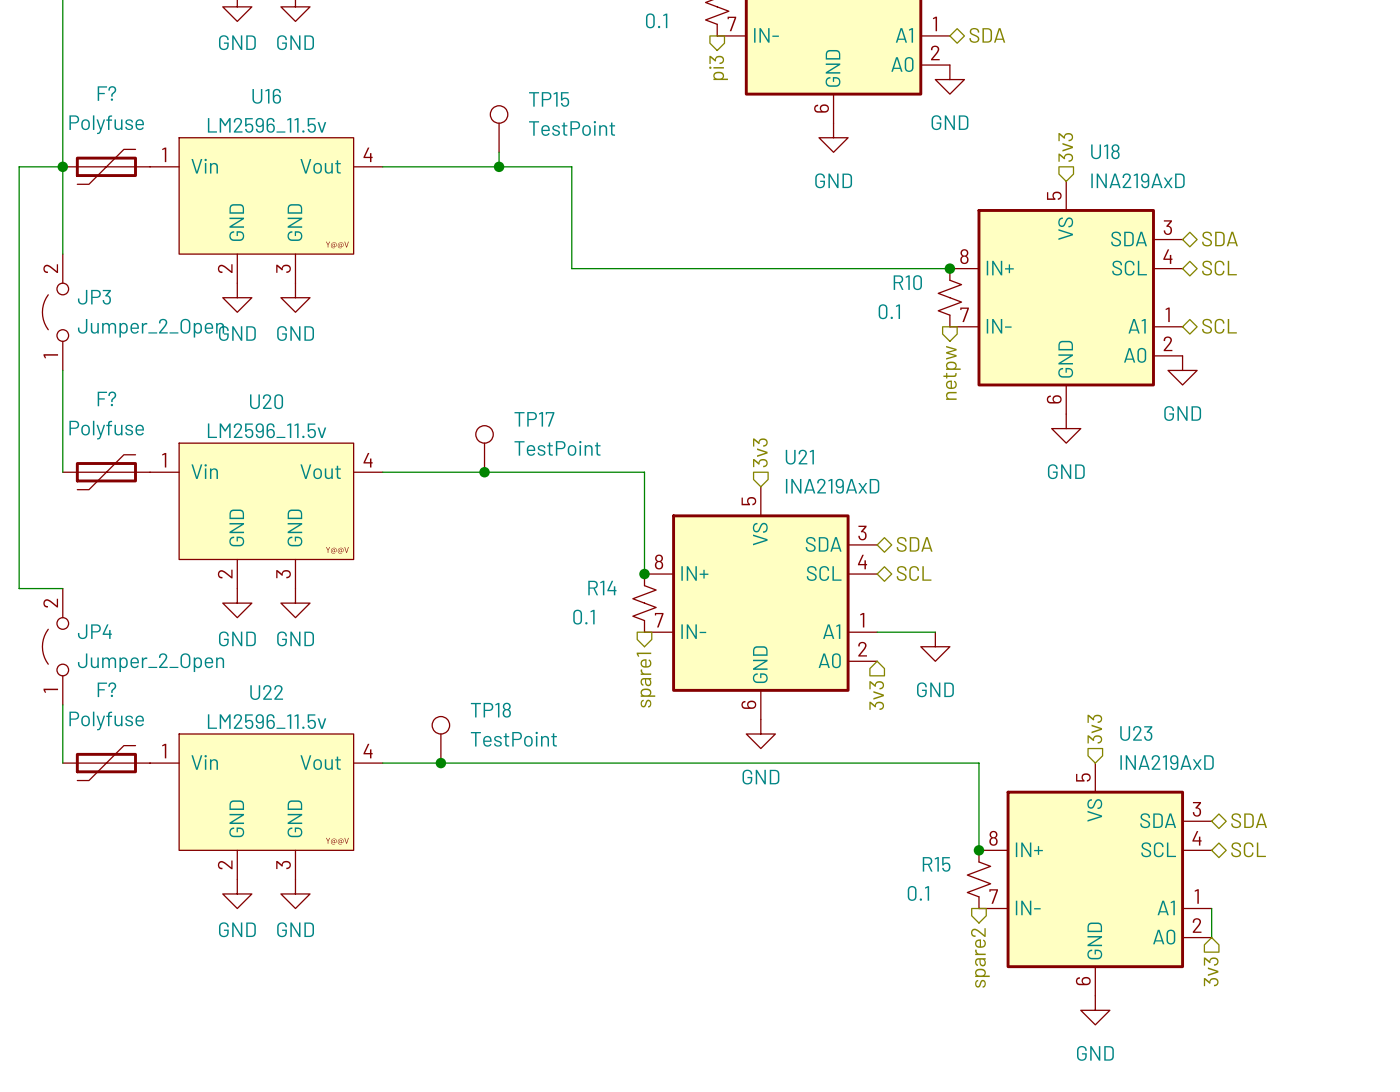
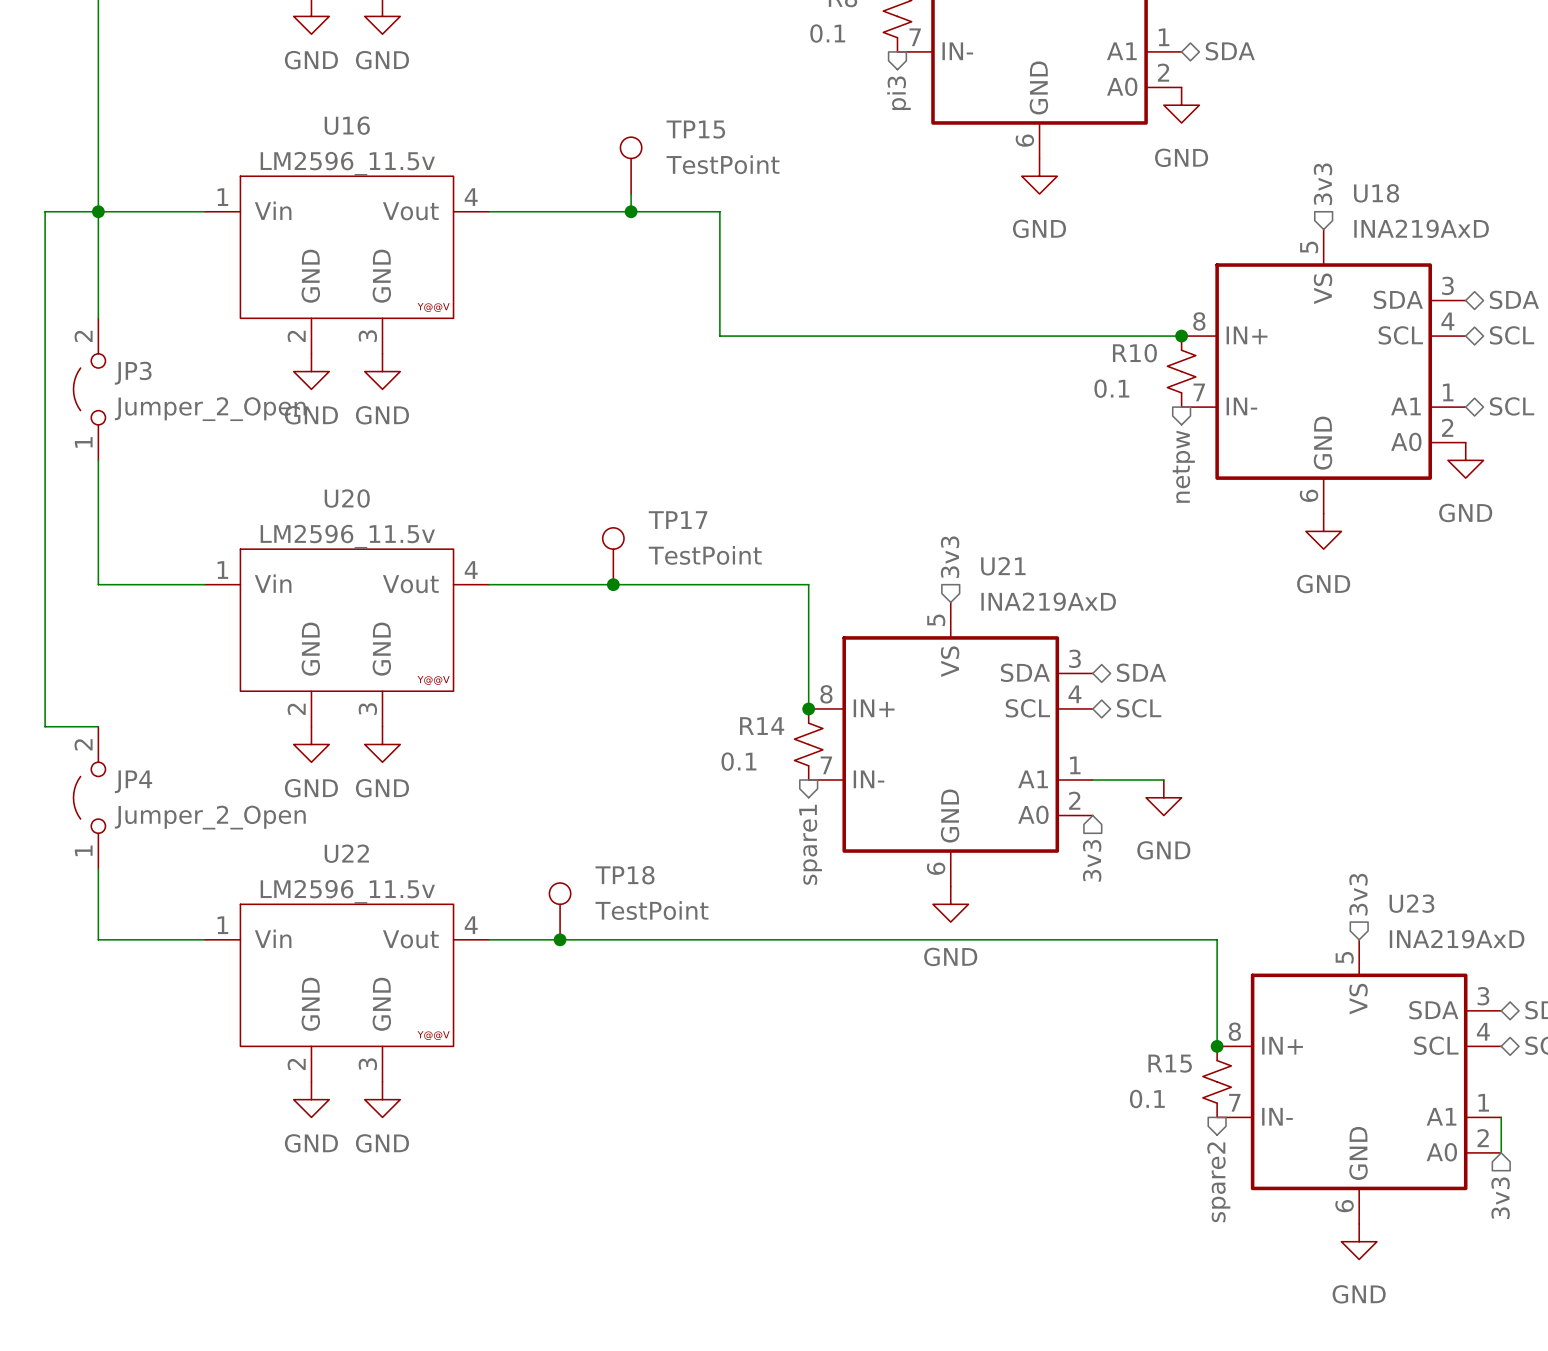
F?: Polyfuse (106, 166) -> none
F?: Polyfuse (106, 472) -> none
F?: Polyfuse (106, 763) -> none

